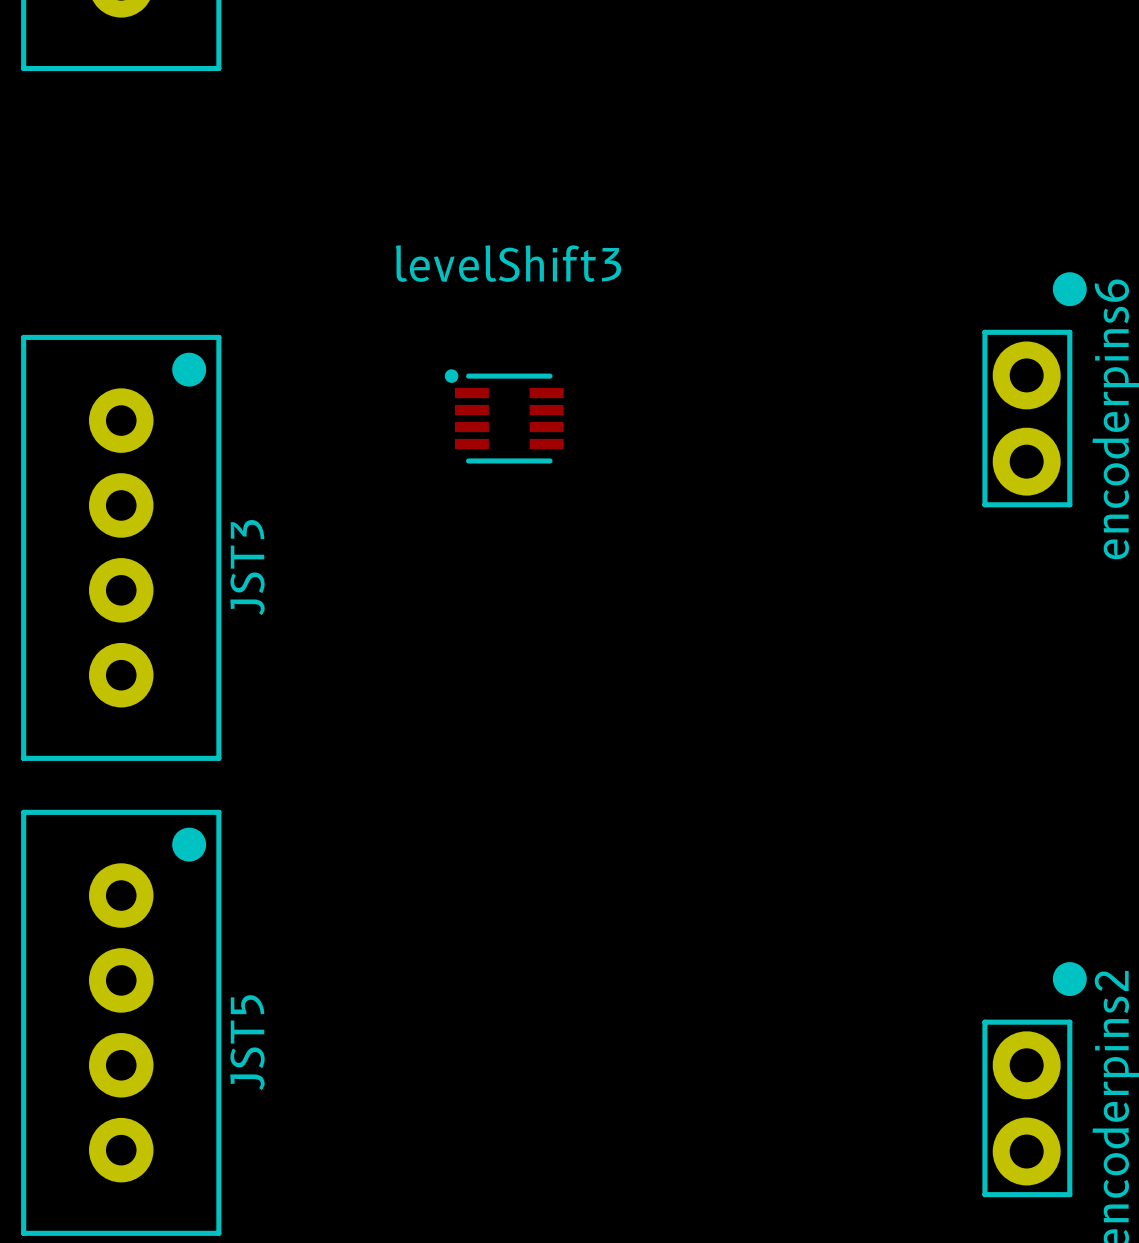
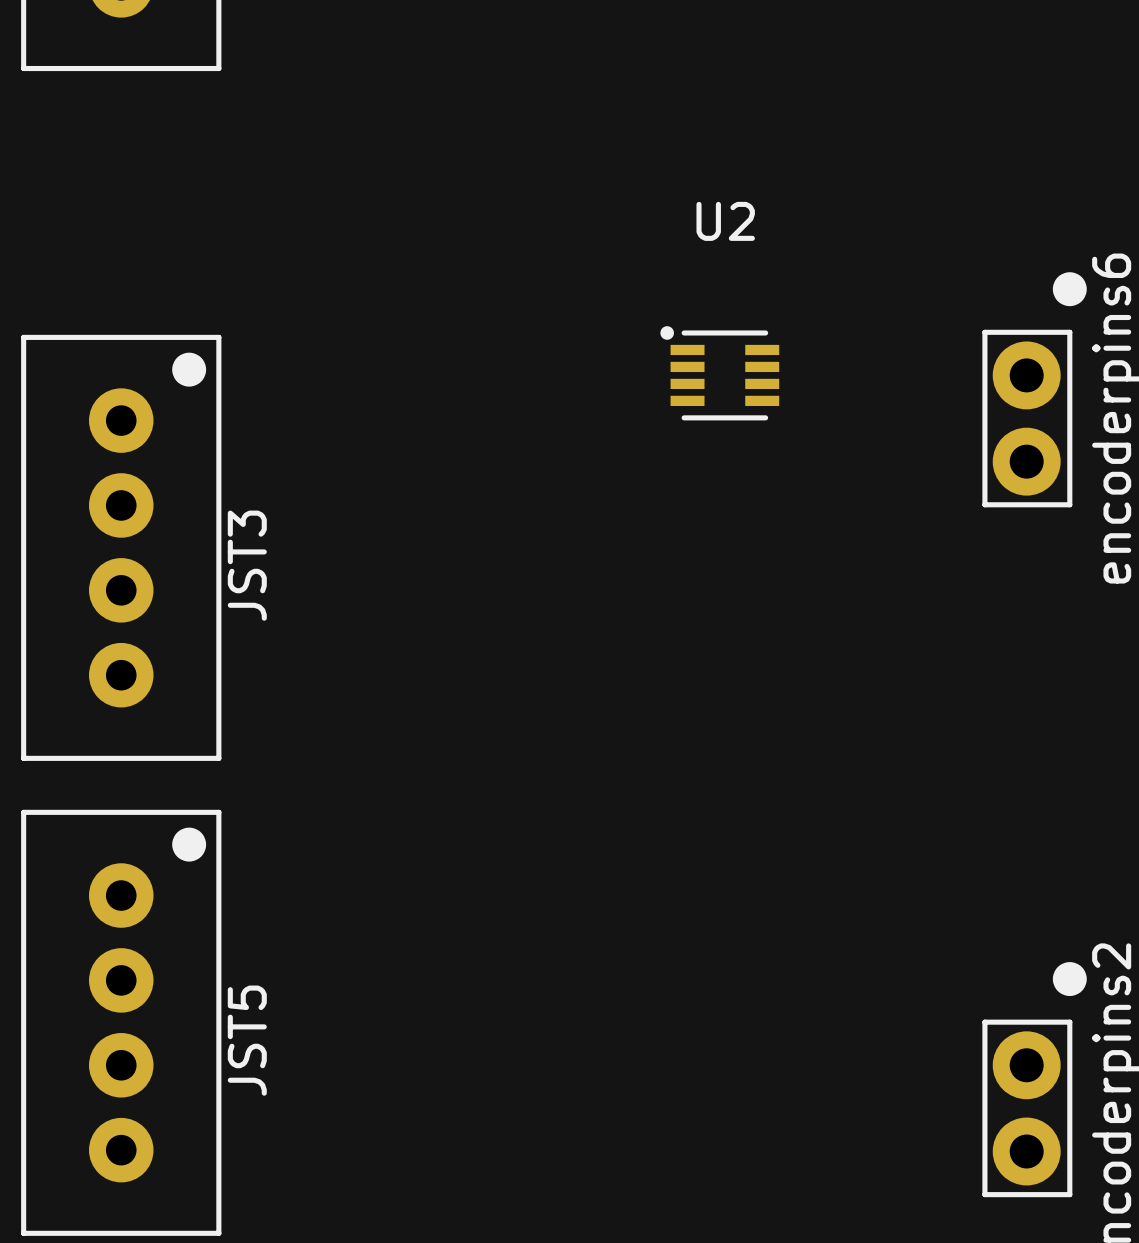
U2: none -> (719, 373)
levelShift3: (504, 416) -> none

